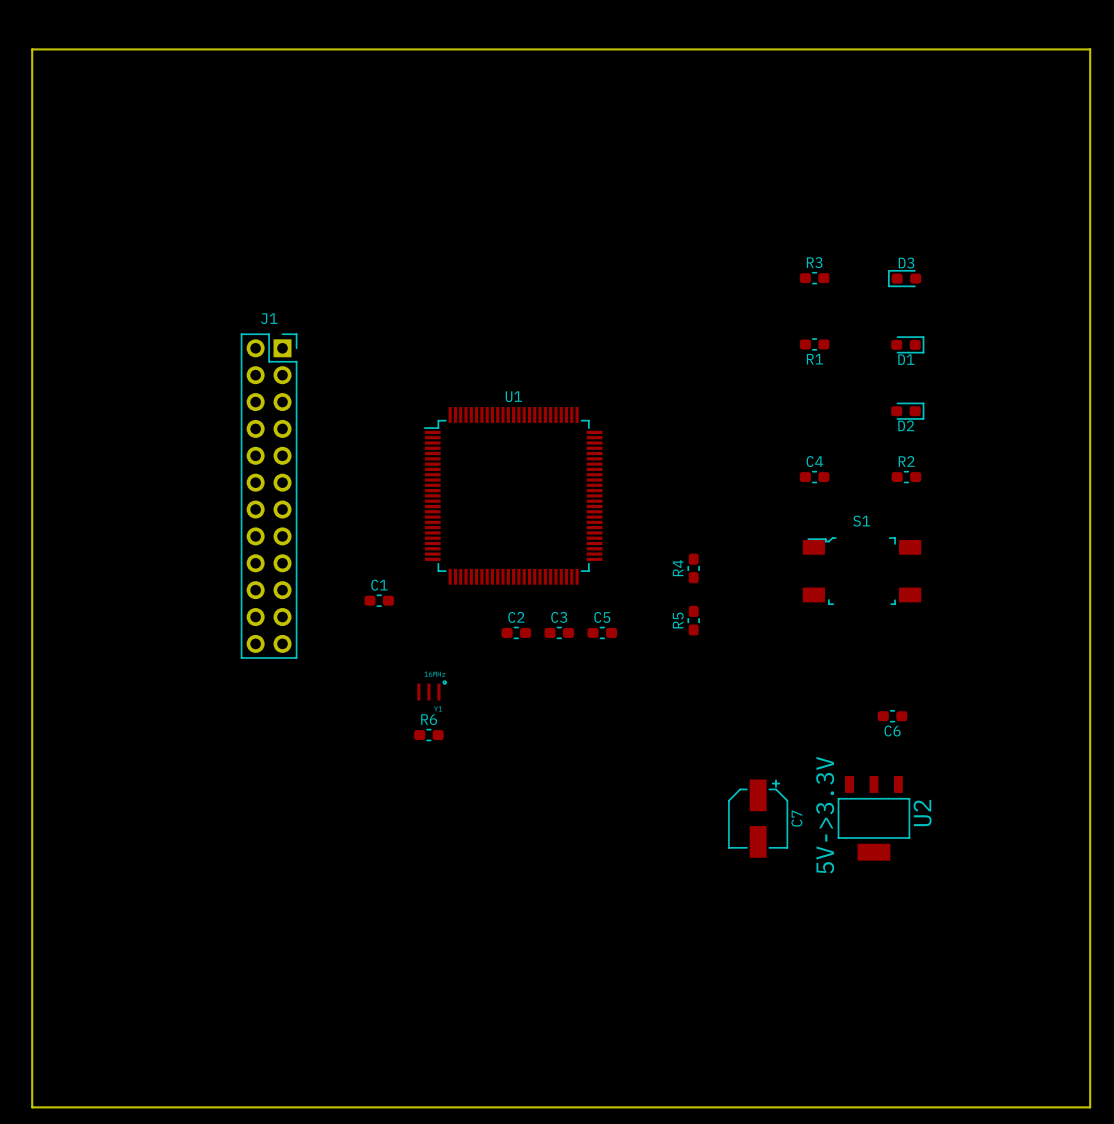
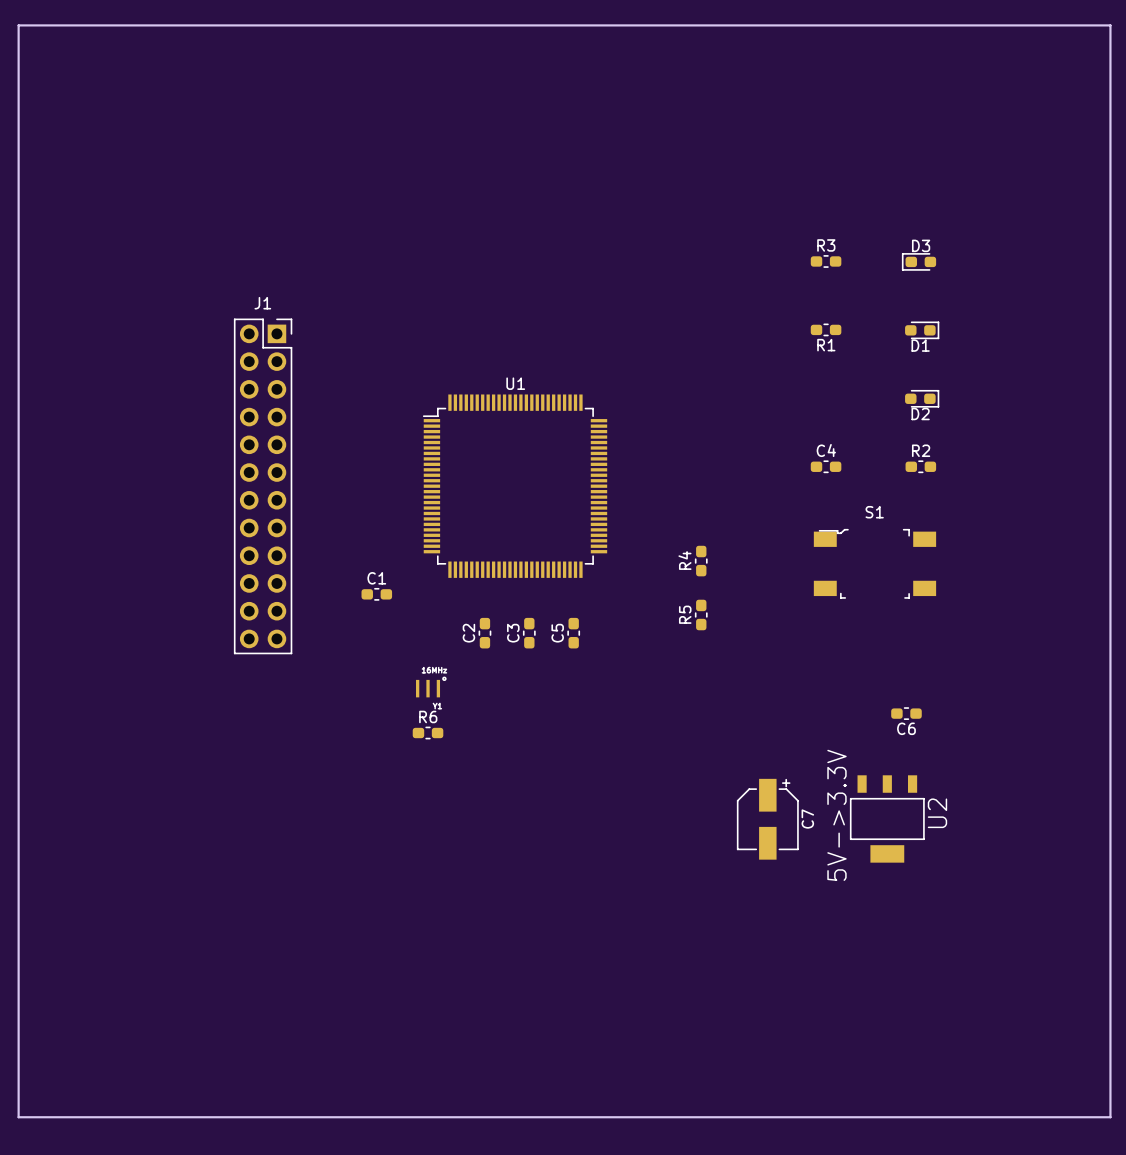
C2 name position: C2 (516, 617) -> C2 (468, 633)
C3 name position: C3 (559, 617) -> C3 (513, 633)
C5 name position: C5 (602, 617) -> C5 (557, 633)
C2 rotation: 0° (516, 632) -> 90° clockwise (484, 633)
C2 position: (516, 632) -> (484, 633)
C3 rotation: 0° (559, 632) -> 90° clockwise (529, 633)
C3 position: (559, 632) -> (529, 633)
C5 rotation: 0° (602, 632) -> 90° clockwise (573, 633)
C5 position: (602, 632) -> (573, 633)

